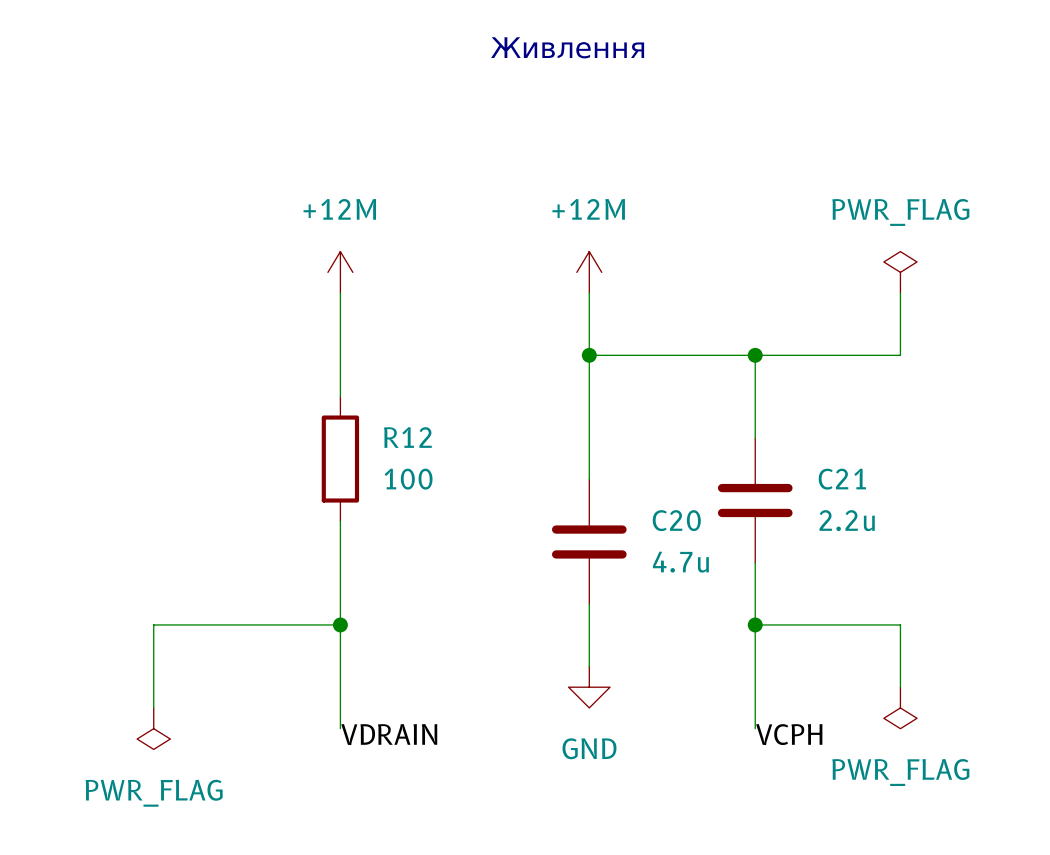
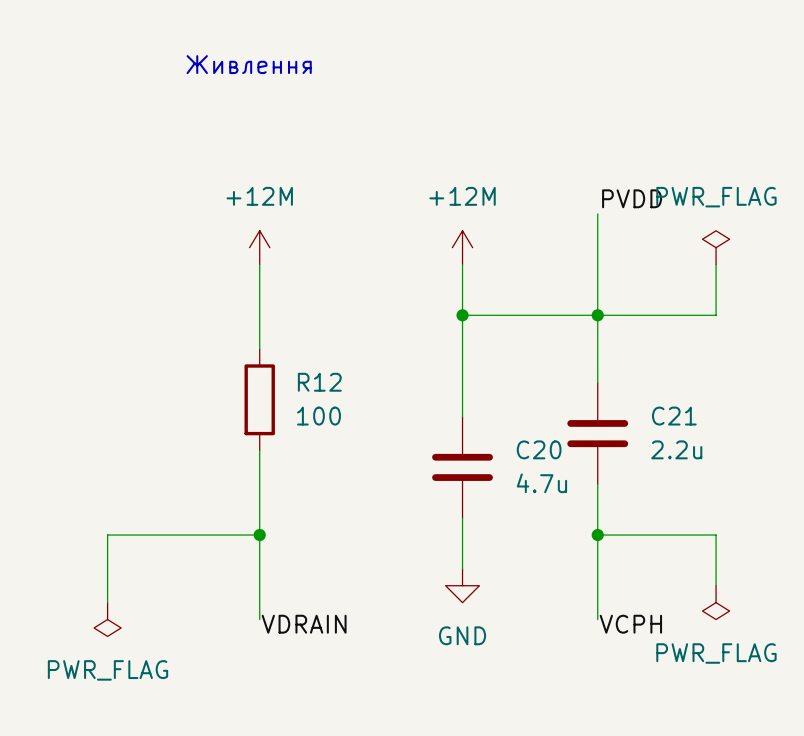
text position: Живлення (567, 47) -> Живлення (249, 64)
label: none -> PVDD (632, 198)
wire: none -> (597, 213) (597, 315)

